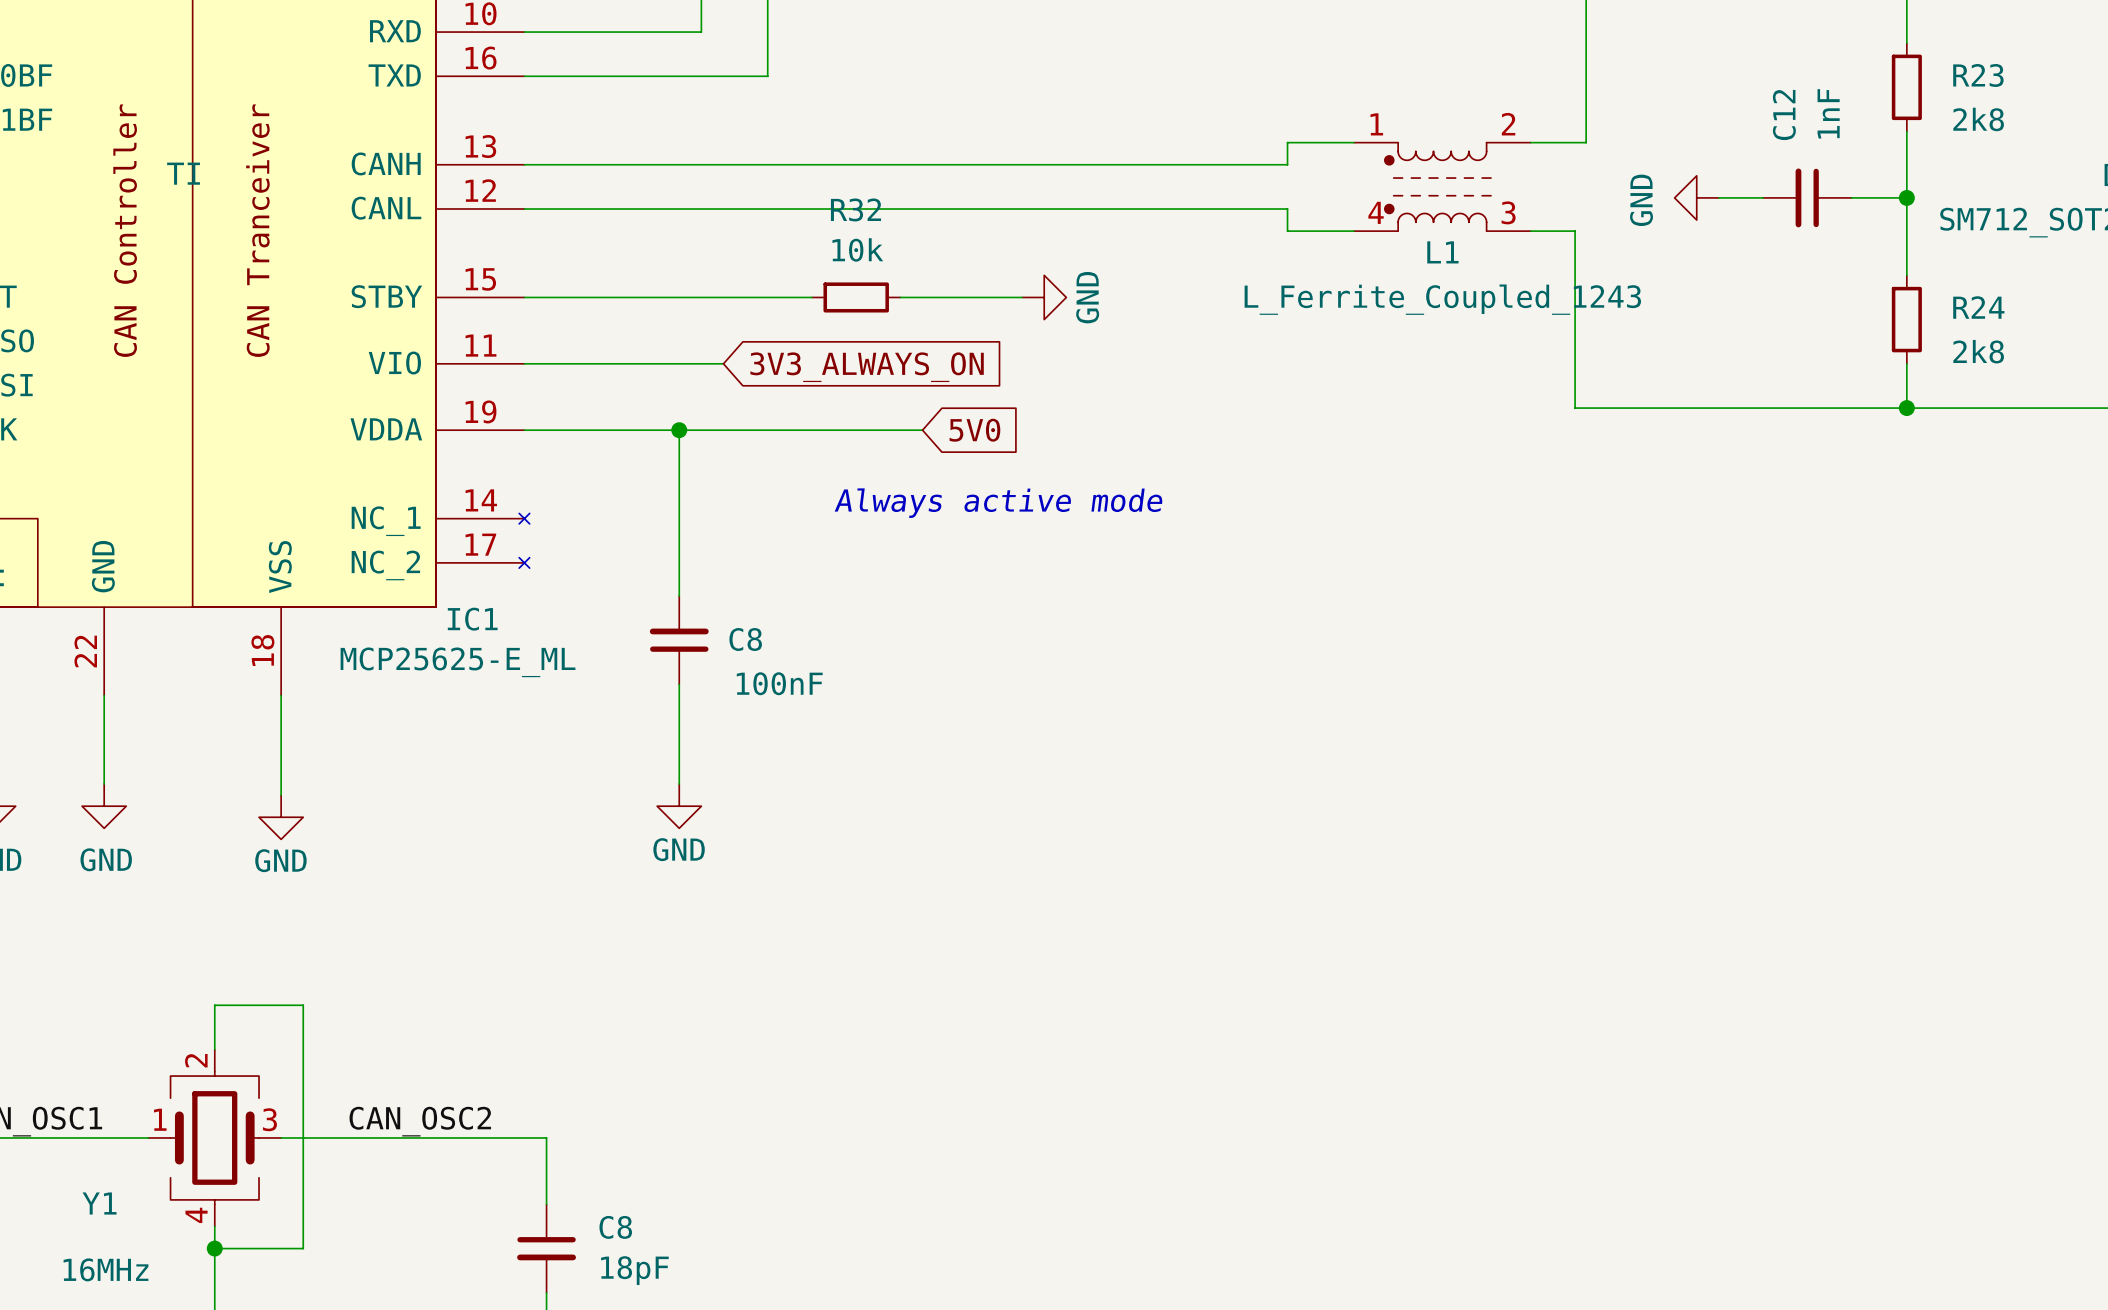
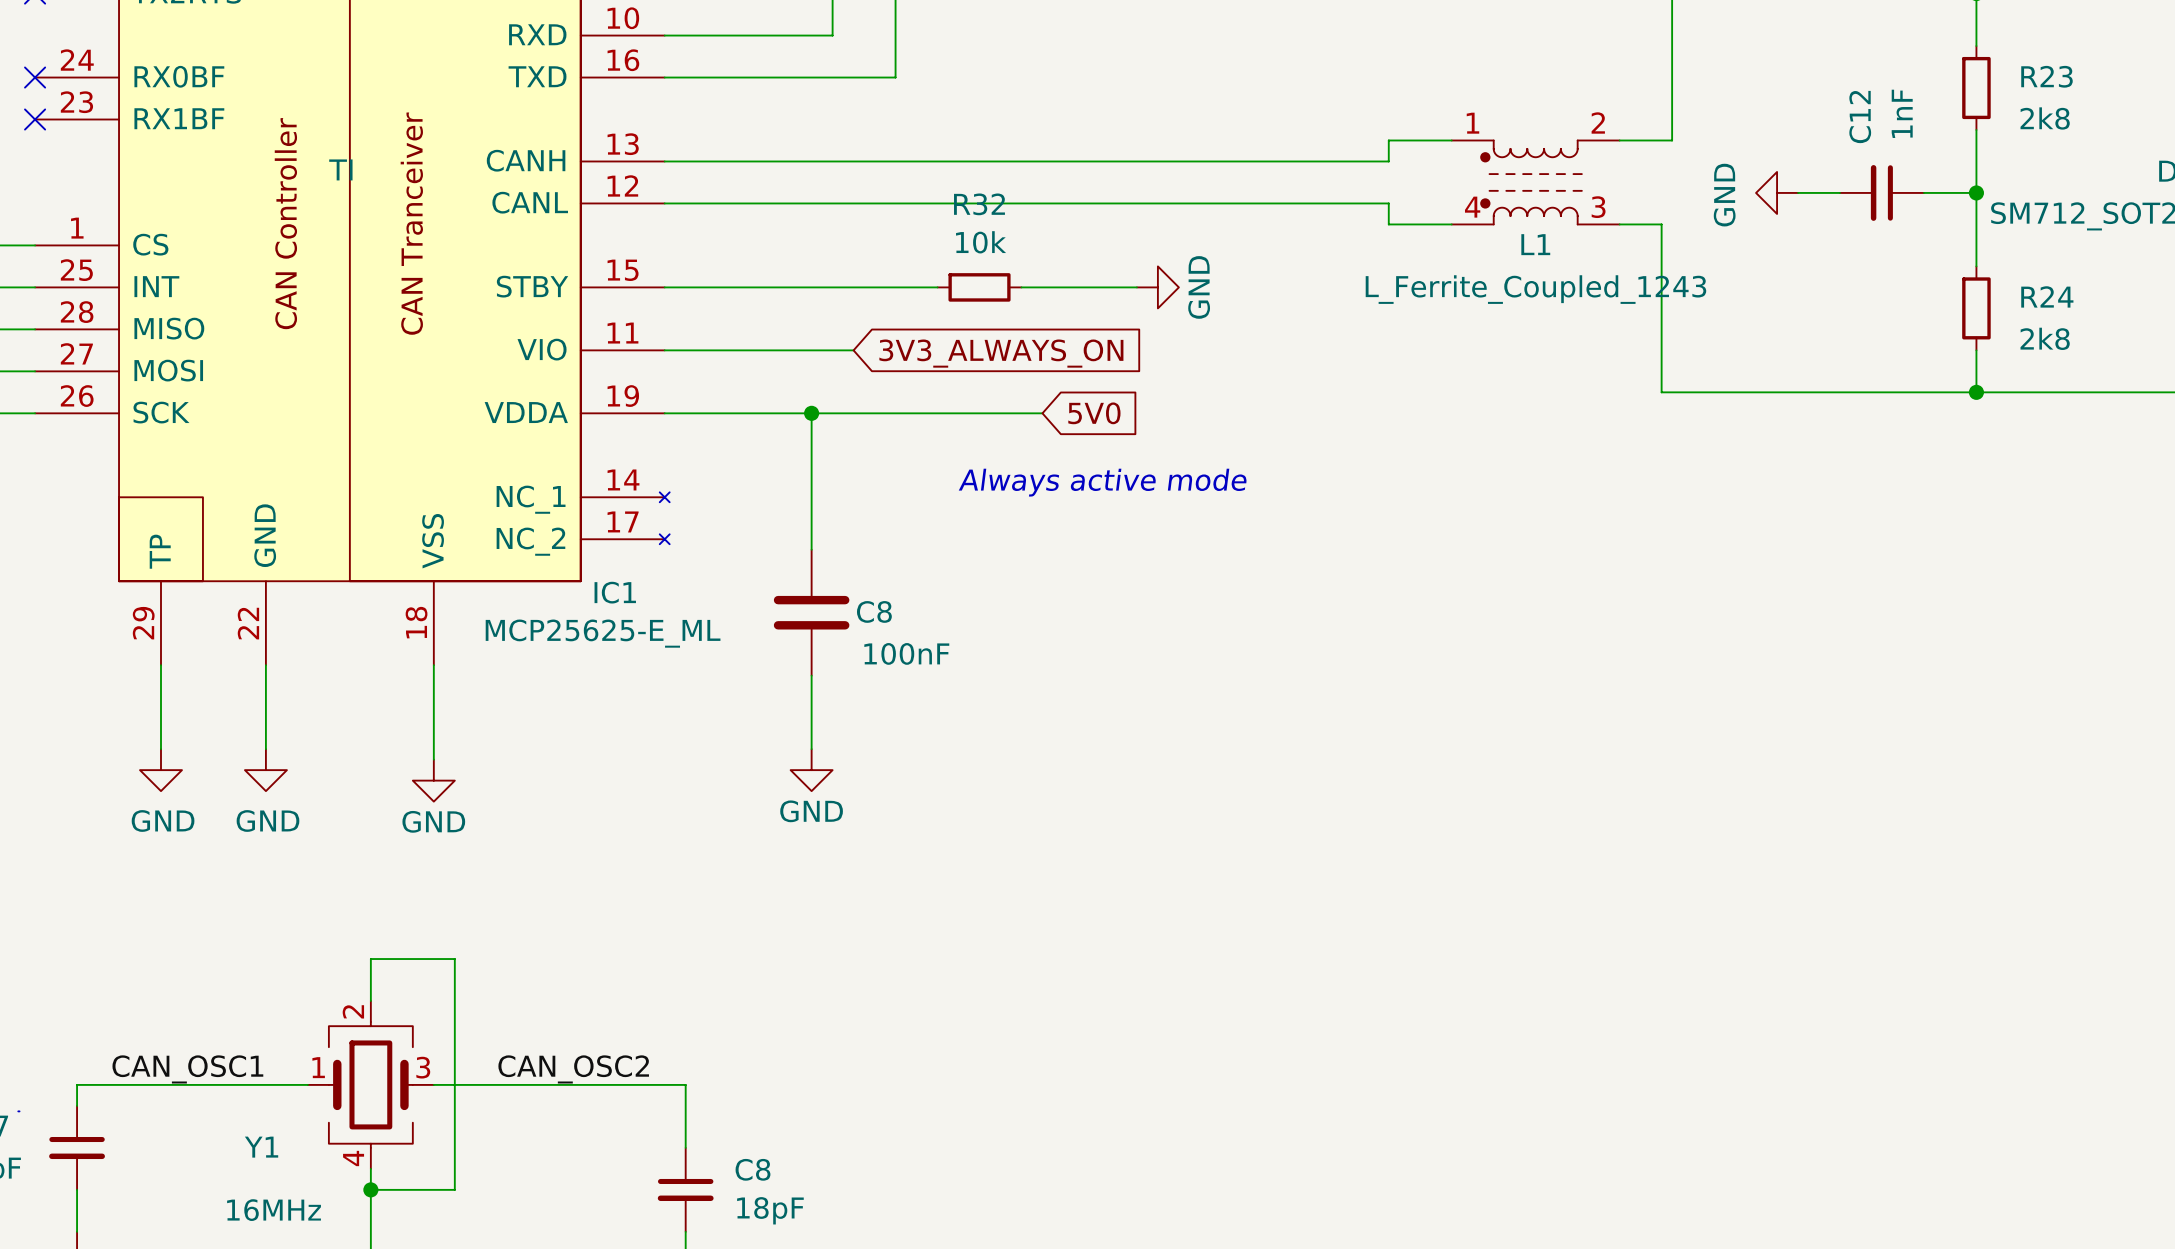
C8 symbol: [649, 596, 709, 685] -> [773, 549, 850, 676]

